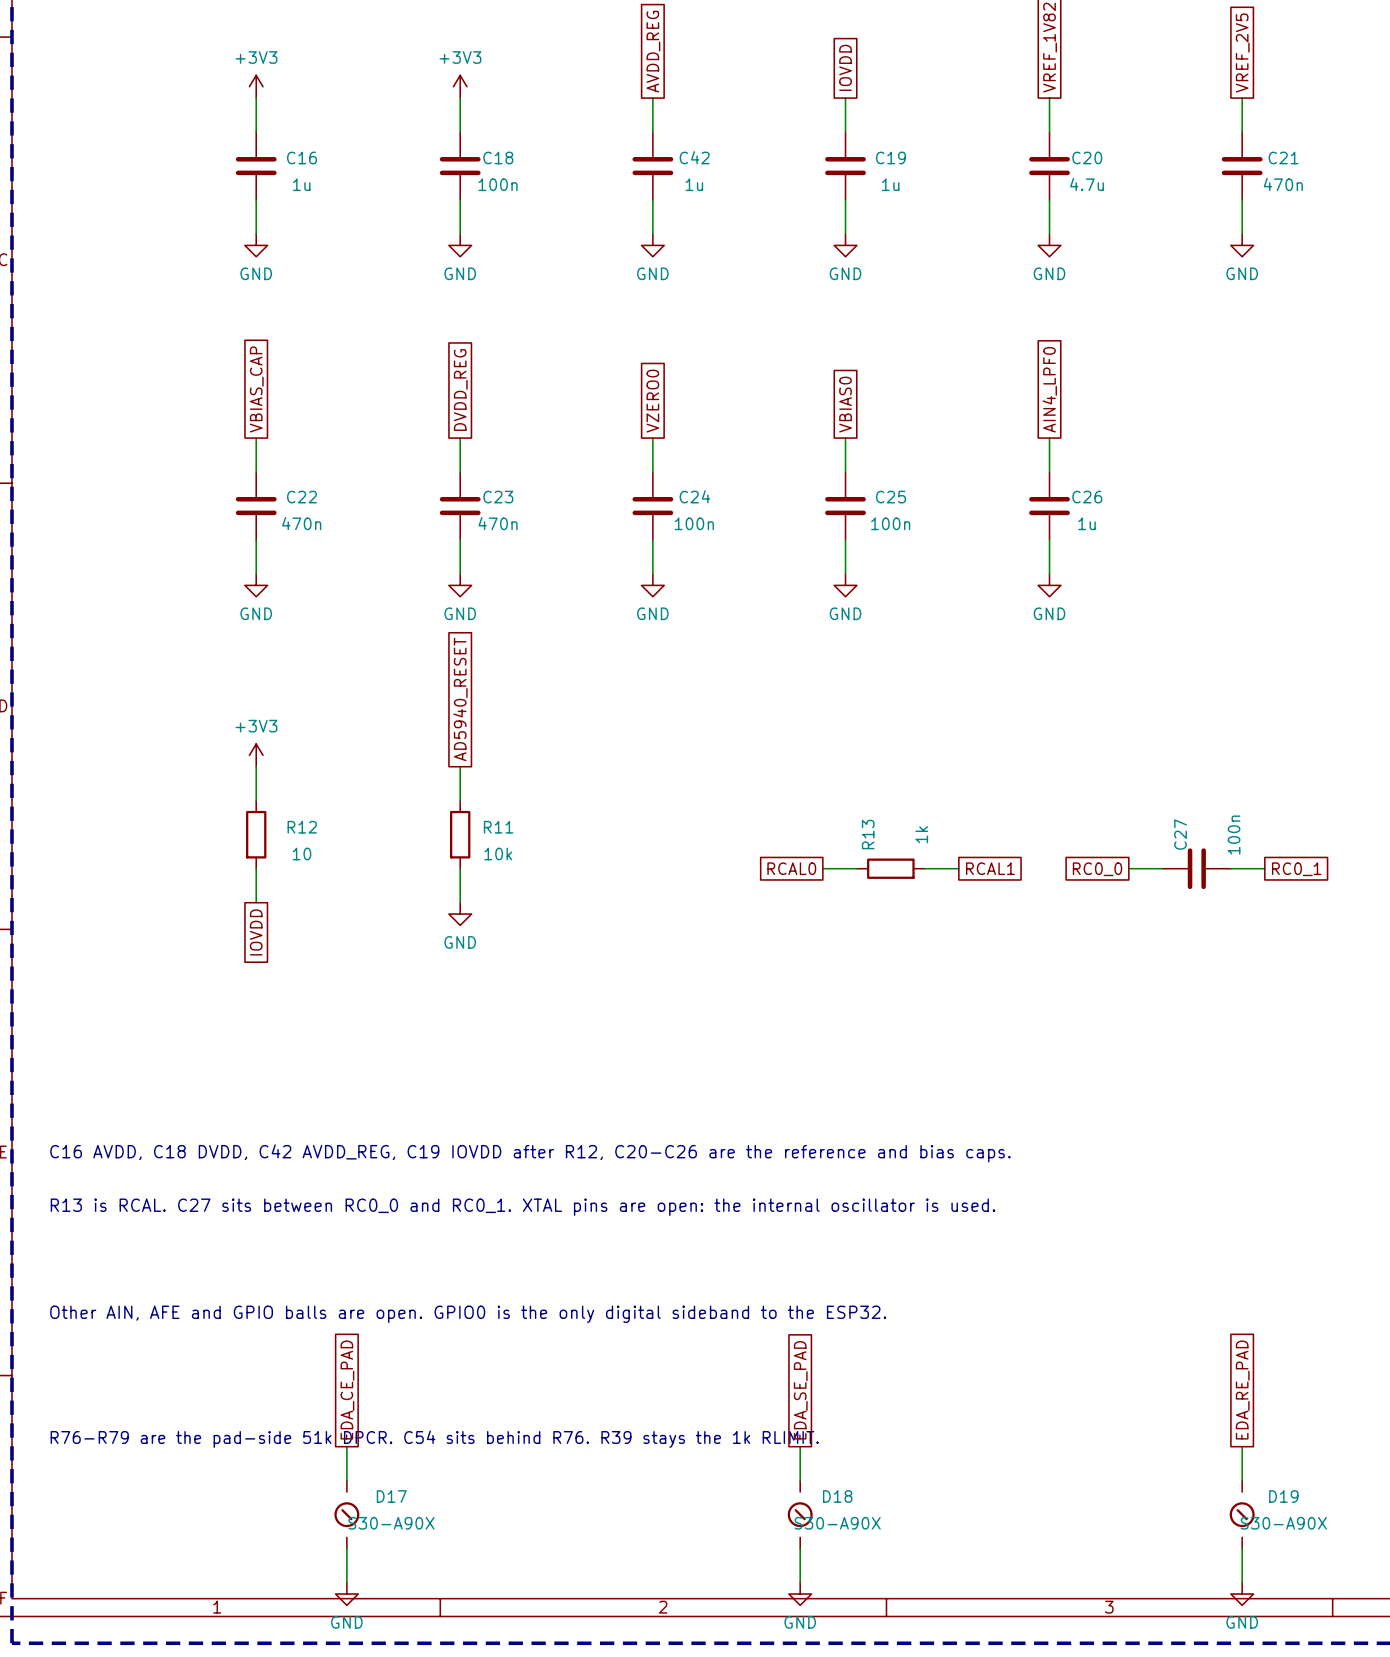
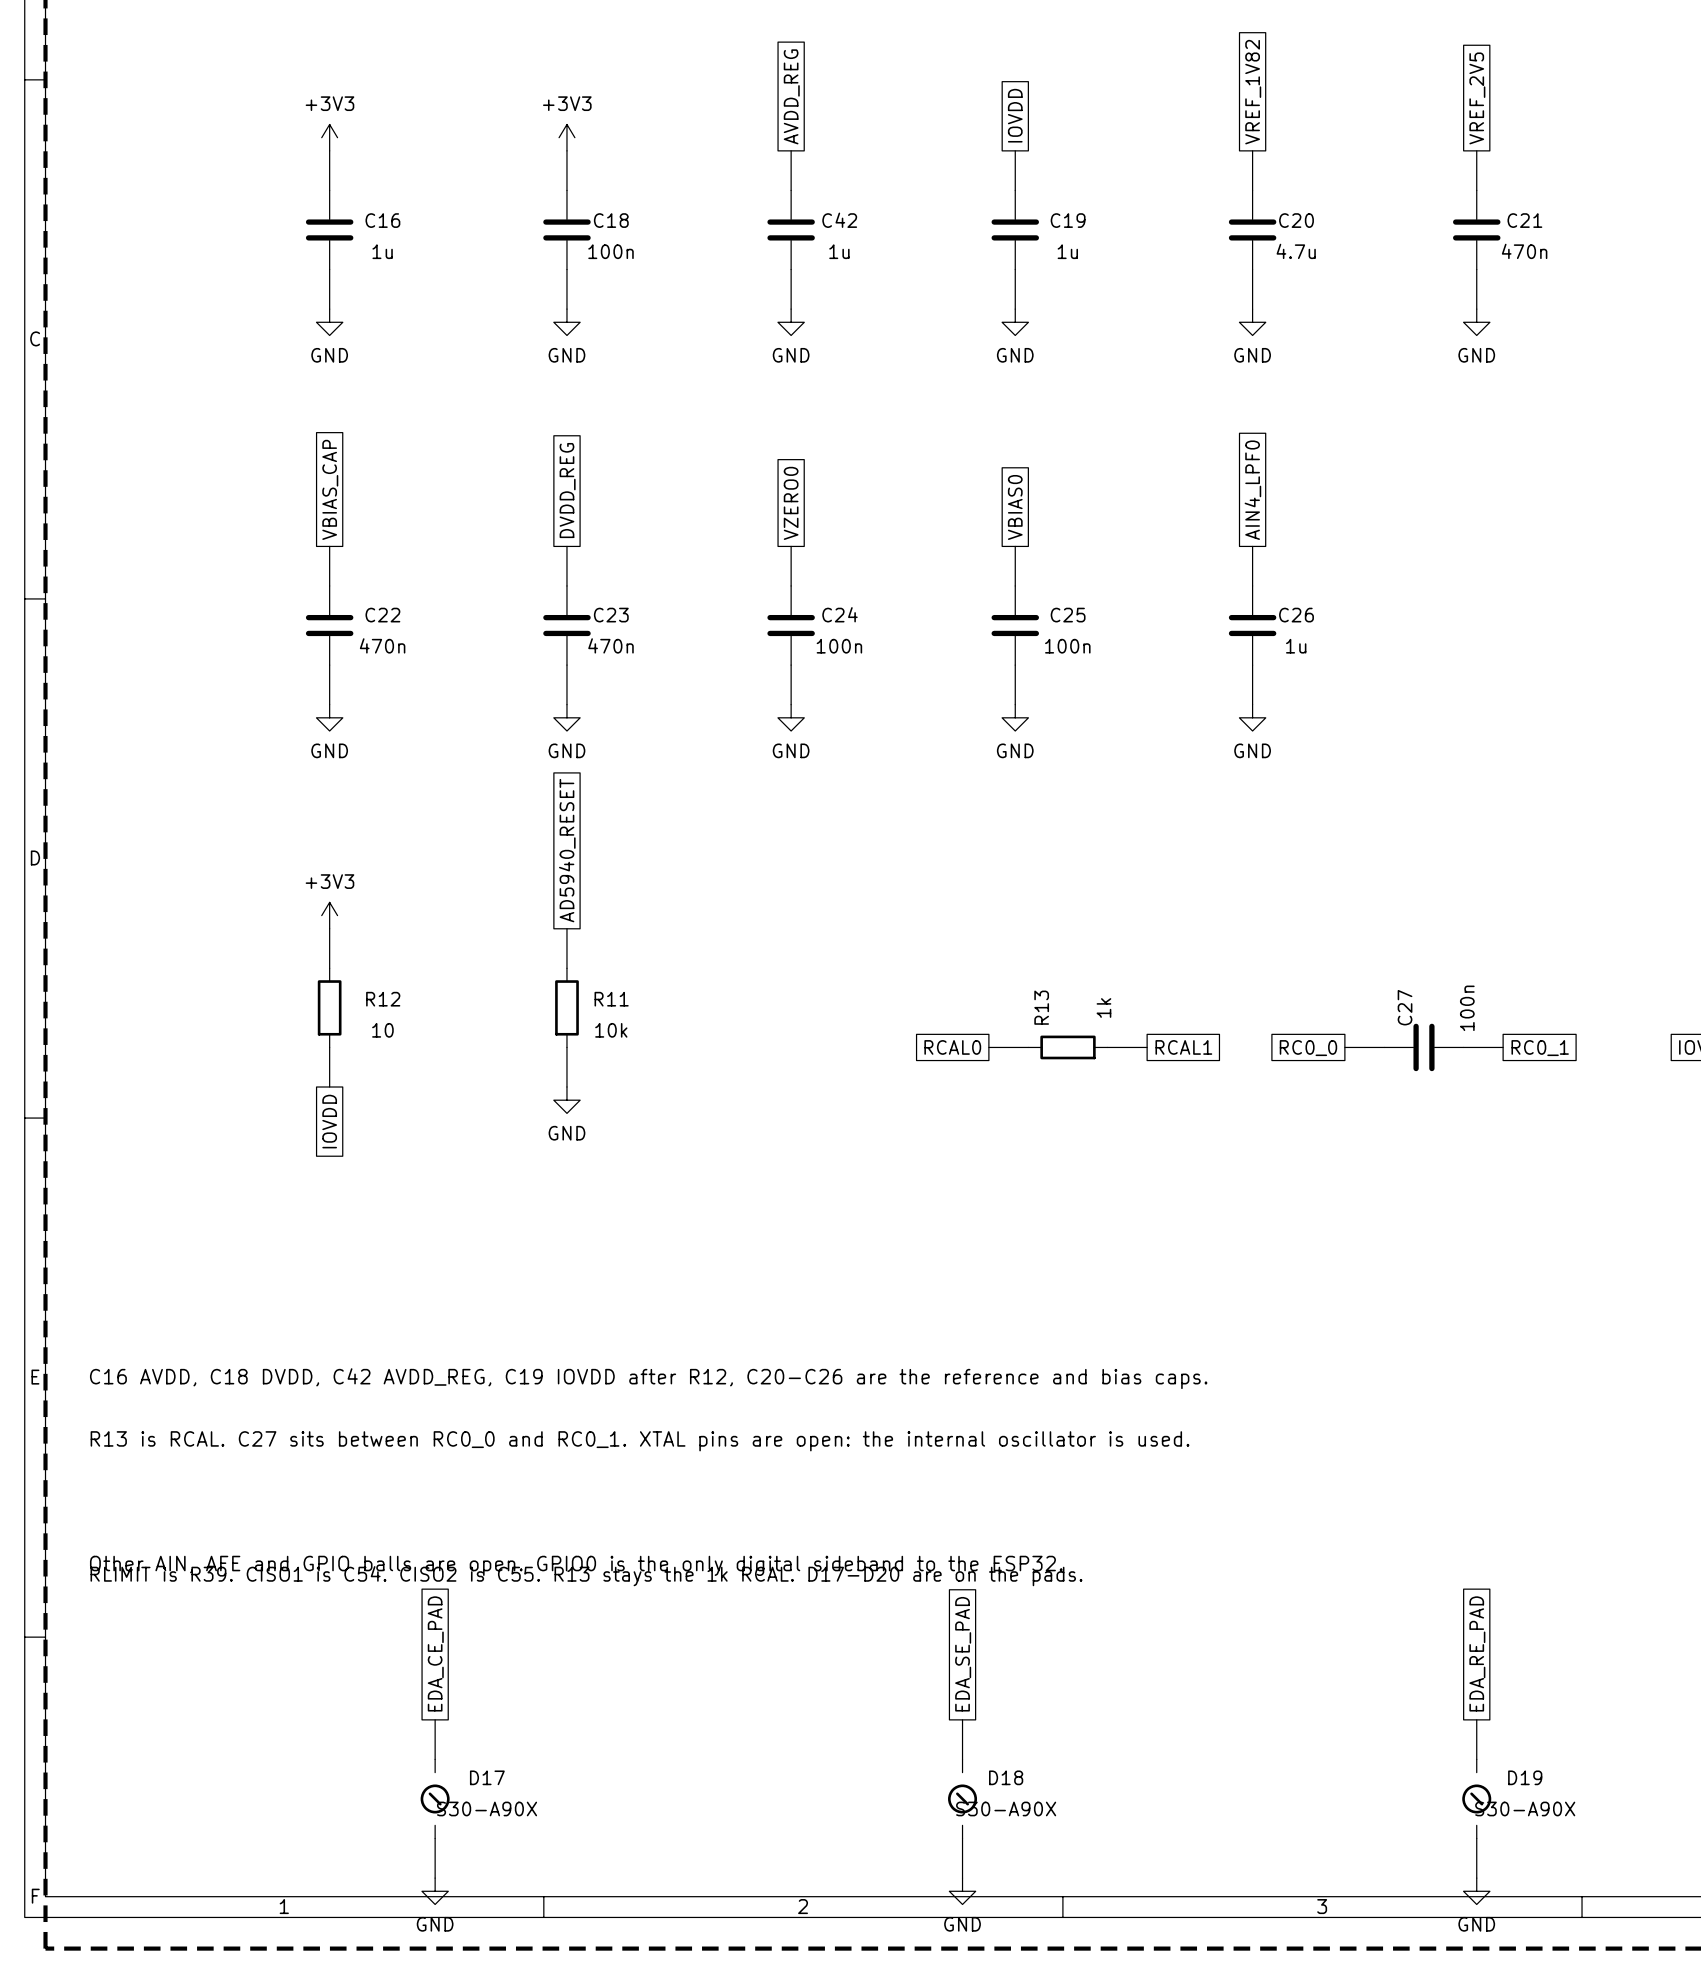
text: none -> RLIMIT is R39. CISO1 is C54. CISO2 is C55. R13 stays the 1k RCAL. D17-D20 are on the pads. (586, 1576)
text: R76-R79 are the pad-side 51k DPCR. C54 sits behind R76. R39 stays the 1k RLIMIT. (434, 1439) -> none

